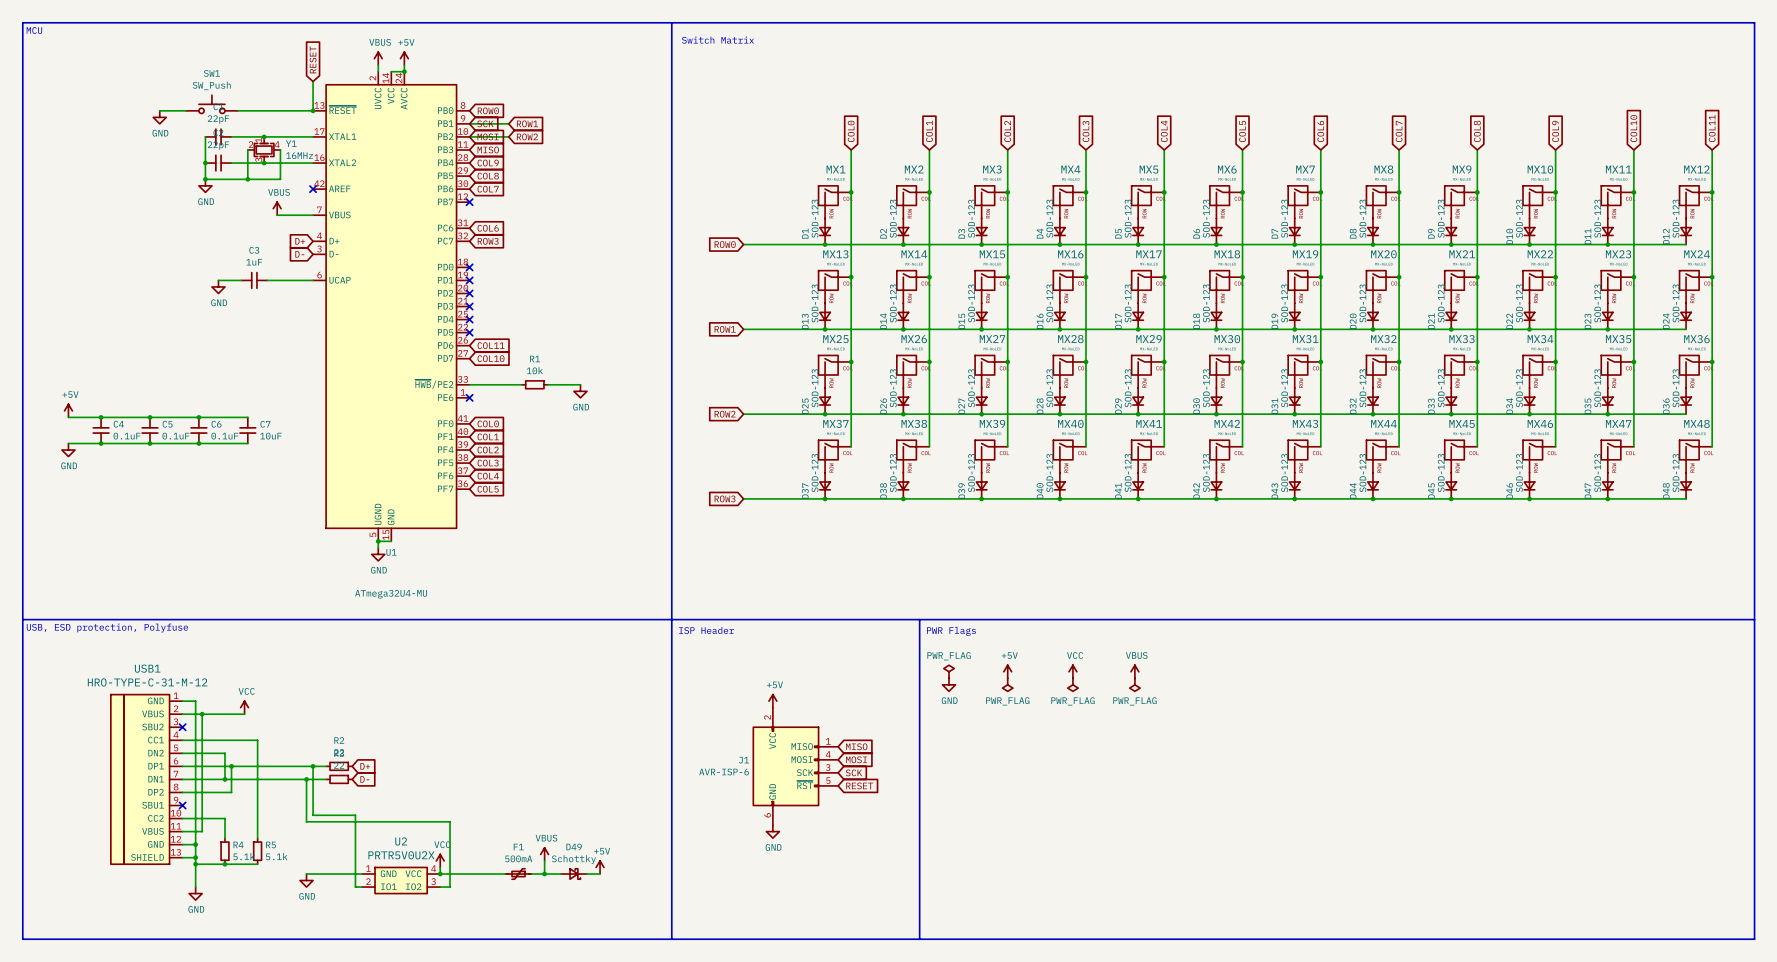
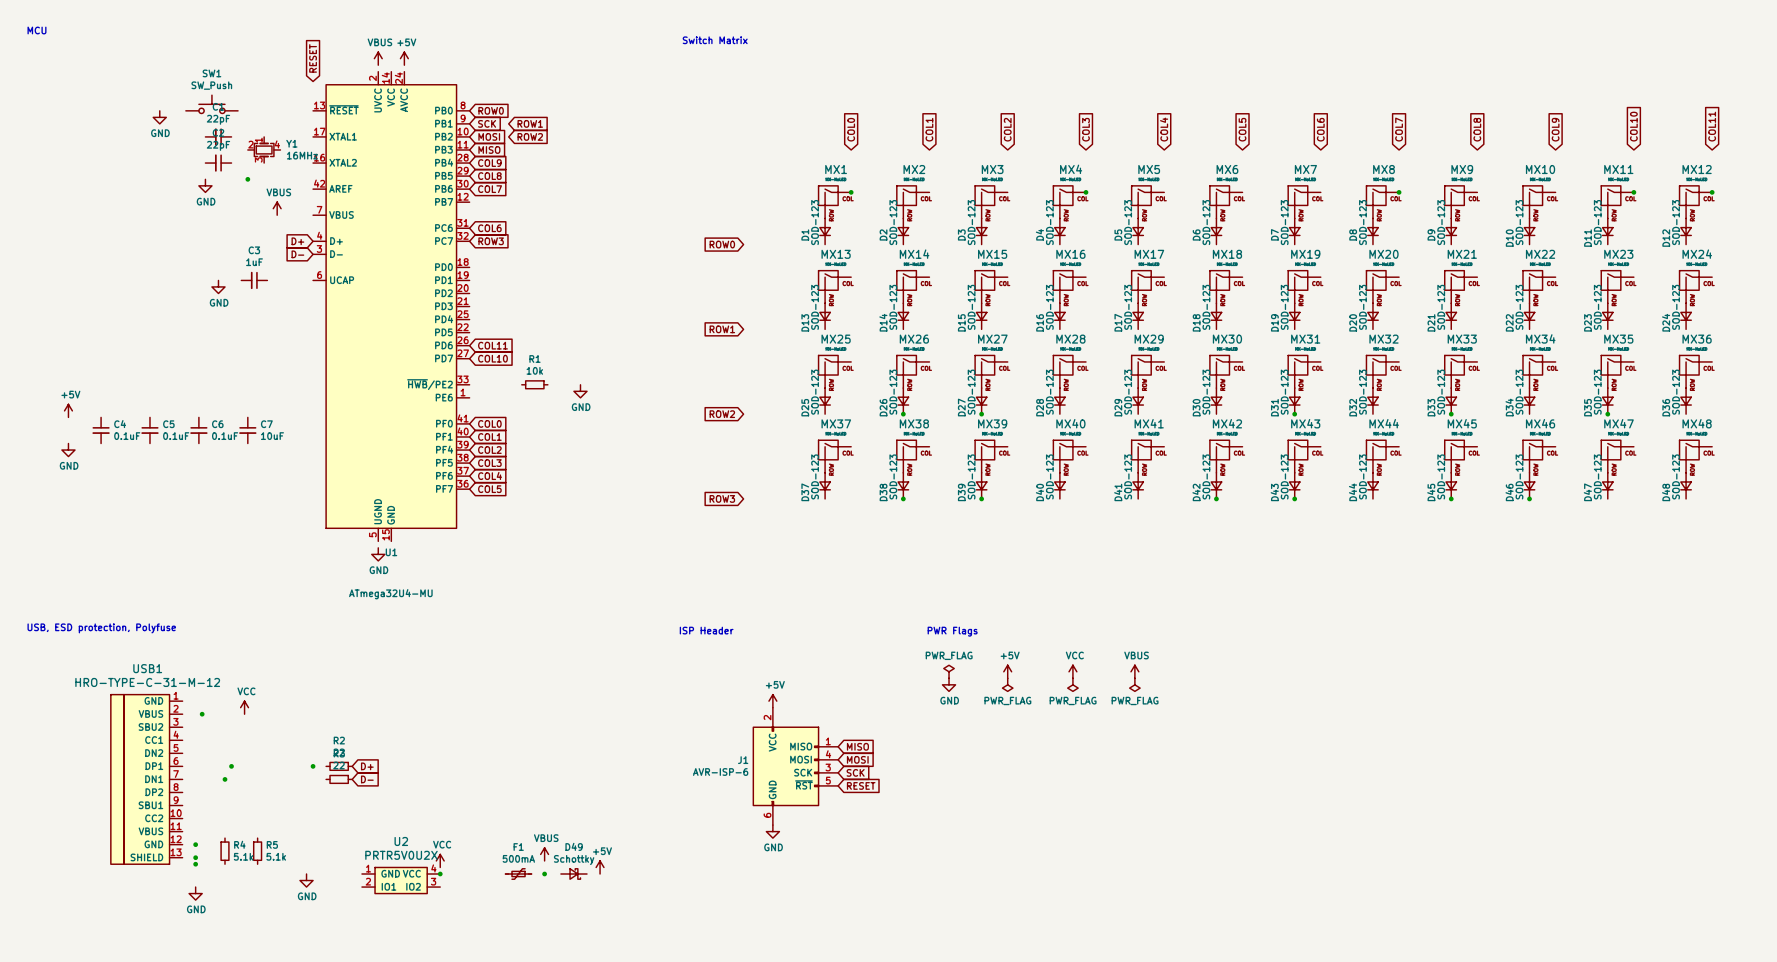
line: (22, 22) (22, 939) (1754, 939) (1754, 22) (22, 22) -> none
line: (671, 22) (671, 939) -> none
wire: (378, 65) (378, 71) -> none
wire: (404, 65) (404, 71) (391, 71) -> none
junction: (404, 71) -> none
wire: (313, 81) (313, 110) (238, 110) -> none
wire: (159, 110) (185, 110) -> none
junction: (313, 110) -> none
wire: (469, 123) (508, 123) -> none
wire: (205, 136) (205, 179) (280, 179) (280, 149) -> none
wire: (231, 136) (313, 136) -> none
junction: (264, 136) -> none
wire: (469, 136) (508, 136) -> none
wire: (247, 149) (247, 179) -> none
wire: (851, 149) (851, 446) -> none
wire: (929, 149) (929, 446) -> none
wire: (1007, 149) (1007, 446) -> none
wire: (1085, 149) (1085, 446) -> none
wire: (1164, 149) (1164, 446) -> none
wire: (1242, 149) (1242, 446) -> none
wire: (1320, 149) (1320, 446) -> none
wire: (1399, 149) (1399, 446) -> none
wire: (1477, 149) (1477, 446) -> none
wire: (1555, 149) (1555, 446) -> none
wire: (1633, 149) (1633, 446) -> none
wire: (1712, 149) (1712, 446) -> none
junction: (205, 163) -> none
wire: (231, 163) (313, 163) -> none
junction: (264, 163) -> none
junction: (205, 179) -> none
no-connect mark: (313, 189) -> none
junction: (929, 192) -> none
junction: (1007, 192) -> none
junction: (1164, 192) -> none
junction: (1242, 192) -> none
junction: (1320, 192) -> none
junction: (1477, 192) -> none
junction: (1555, 192) -> none
no-connect mark: (469, 202) -> none
wire: (277, 215) (313, 215) -> none
wire: (743, 244) (1686, 244) -> none
junction: (825, 244) -> none
junction: (903, 244) -> none
junction: (981, 244) -> none
junction: (1059, 244) -> none
junction: (1138, 244) -> none
junction: (1216, 244) -> none
junction: (1294, 244) -> none
junction: (1372, 244) -> none
junction: (1451, 244) -> none
junction: (1529, 244) -> none
junction: (1607, 244) -> none
no-connect mark: (469, 267) -> none
junction: (851, 277) -> none
junction: (929, 277) -> none
junction: (1007, 277) -> none
junction: (1085, 277) -> none
junction: (1164, 277) -> none
junction: (1242, 277) -> none
junction: (1320, 277) -> none
junction: (1399, 277) -> none
junction: (1477, 277) -> none
junction: (1555, 277) -> none
junction: (1633, 277) -> none
junction: (1712, 277) -> none
wire: (218, 280) (241, 280) -> none
wire: (267, 280) (313, 280) -> none
no-connect mark: (469, 280) -> none
no-connect mark: (469, 293) -> none
no-connect mark: (469, 306) -> none
no-connect mark: (469, 319) -> none
wire: (743, 329) (1686, 329) -> none
junction: (825, 329) -> none
junction: (903, 329) -> none
junction: (981, 329) -> none
junction: (1059, 329) -> none
junction: (1138, 329) -> none
junction: (1216, 329) -> none
junction: (1294, 329) -> none
junction: (1372, 329) -> none
junction: (1451, 329) -> none
junction: (1529, 329) -> none
junction: (1607, 329) -> none
no-connect mark: (469, 332) -> none
junction: (851, 361) -> none
junction: (929, 361) -> none
junction: (1007, 361) -> none
junction: (1085, 361) -> none
junction: (1164, 361) -> none
junction: (1242, 361) -> none
junction: (1320, 361) -> none
junction: (1399, 361) -> none
junction: (1477, 361) -> none
junction: (1555, 361) -> none
junction: (1633, 361) -> none
junction: (1712, 361) -> none
wire: (469, 384) (521, 384) -> none
wire: (547, 384) (580, 384) -> none
no-connect mark: (469, 397) -> none
wire: (743, 414) (1686, 414) -> none
junction: (825, 414) -> none
junction: (1059, 414) -> none
junction: (1138, 414) -> none
junction: (1216, 414) -> none
junction: (1372, 414) -> none
junction: (1529, 414) -> none
wire: (68, 417) (247, 417) -> none
junction: (101, 417) -> none
junction: (149, 417) -> none
junction: (198, 417) -> none
wire: (68, 443) (247, 443) -> none
junction: (101, 443) -> none
junction: (149, 443) -> none
junction: (198, 443) -> none
wire: (743, 498) (1686, 498) -> none
junction: (825, 498) -> none
junction: (1059, 498) -> none
junction: (1138, 498) -> none
junction: (1372, 498) -> none
junction: (1607, 498) -> none
junction: (378, 541) -> none
wire: (391, 541) (378, 541) (378, 547) -> none
line: (22, 619) (1754, 619) -> none
line: (919, 619) (919, 939) -> none
wire: (182, 701) (195, 701) (195, 887) -> none
wire: (182, 714) (244, 714) -> none
wire: (202, 714) (202, 831) (182, 831) -> none
no-connect mark: (182, 727) -> none
wire: (182, 740) (257, 740) (257, 838) -> none
wire: (182, 753) (224, 753) (224, 779) -> none
wire: (182, 766) (326, 766) -> none
wire: (231, 766) (231, 792) (182, 792) -> none
wire: (313, 766) (313, 815) (355, 815) (355, 887) (361, 887) -> none
wire: (182, 779) (326, 779) -> none
wire: (306, 779) (306, 821) (450, 821) (450, 887) (440, 887) -> none
junction: (306, 779) -> none
no-connect mark: (182, 805) -> none
wire: (182, 818) (224, 818) (224, 838) -> none
wire: (182, 844) (195, 844) -> none
wire: (182, 857) (195, 857) -> none
wire: (544, 860) (544, 873) -> none
wire: (195, 864) (257, 864) -> none
junction: (224, 864) -> none
wire: (440, 867) (440, 873) (505, 873) -> none
wire: (306, 873) (361, 873) -> none
wire: (531, 873) (560, 873) -> none
wire: (587, 873) (600, 873) -> none

